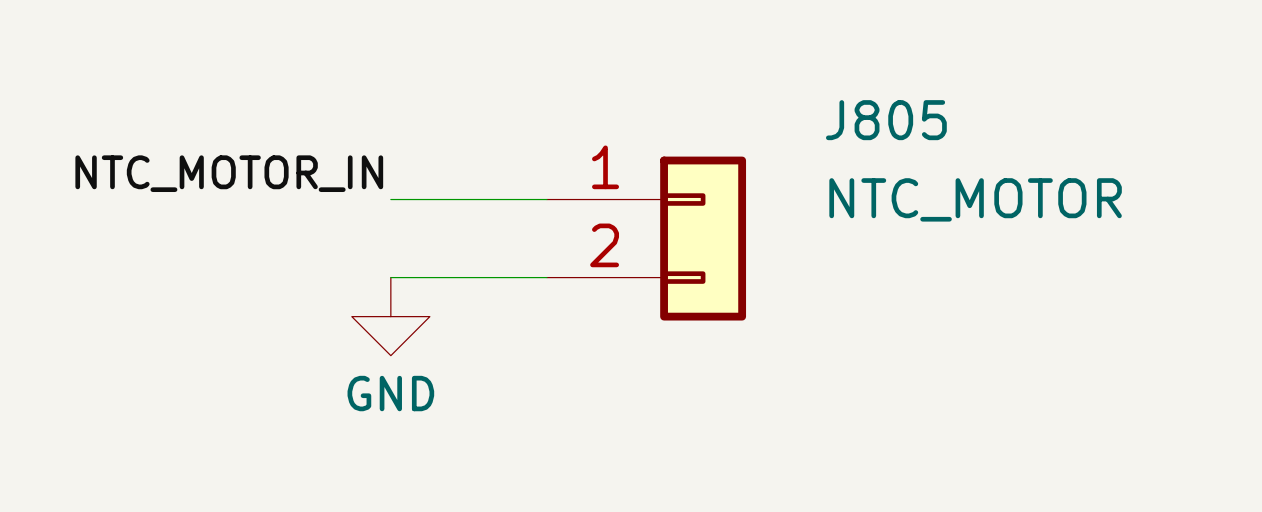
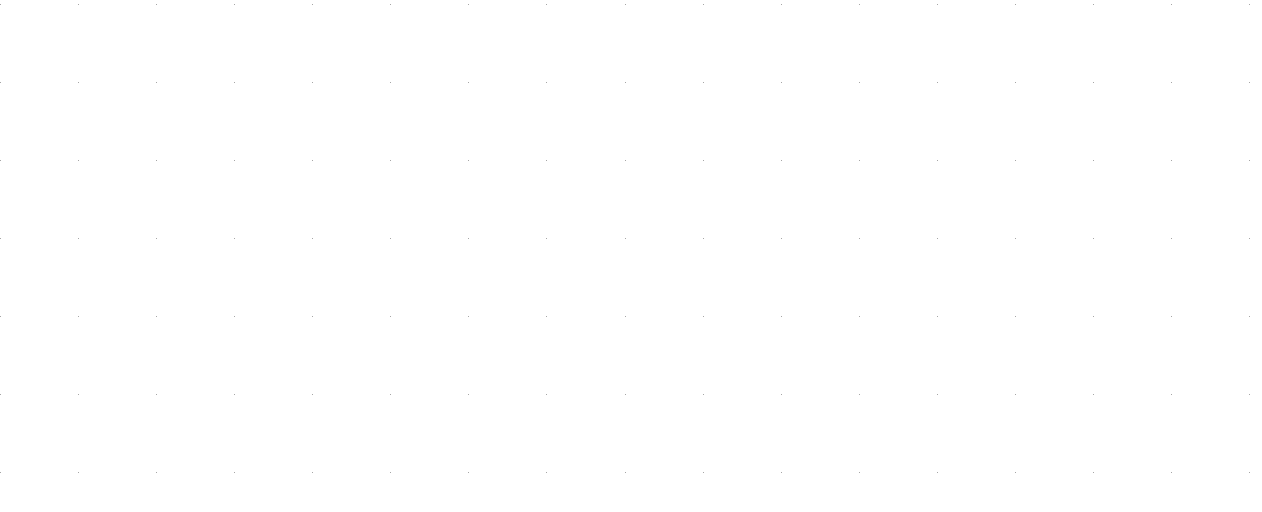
label: NTC_MOTOR_IN (229, 173) -> none
wire: (390, 199) (546, 199) -> none
J805: NTC_MOTOR (646, 238) -> none
wire: (390, 277) (546, 277) -> none
power symbol: GND (390, 316) -> none

